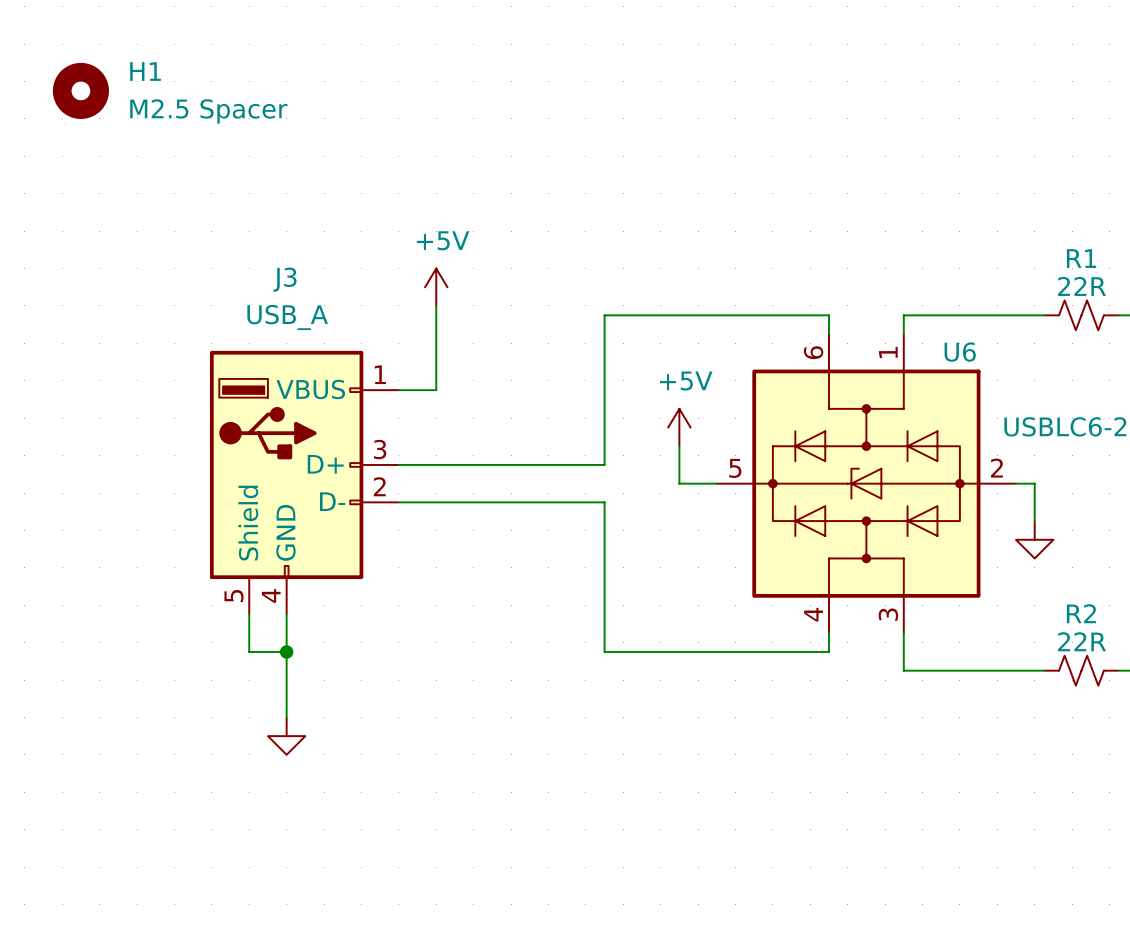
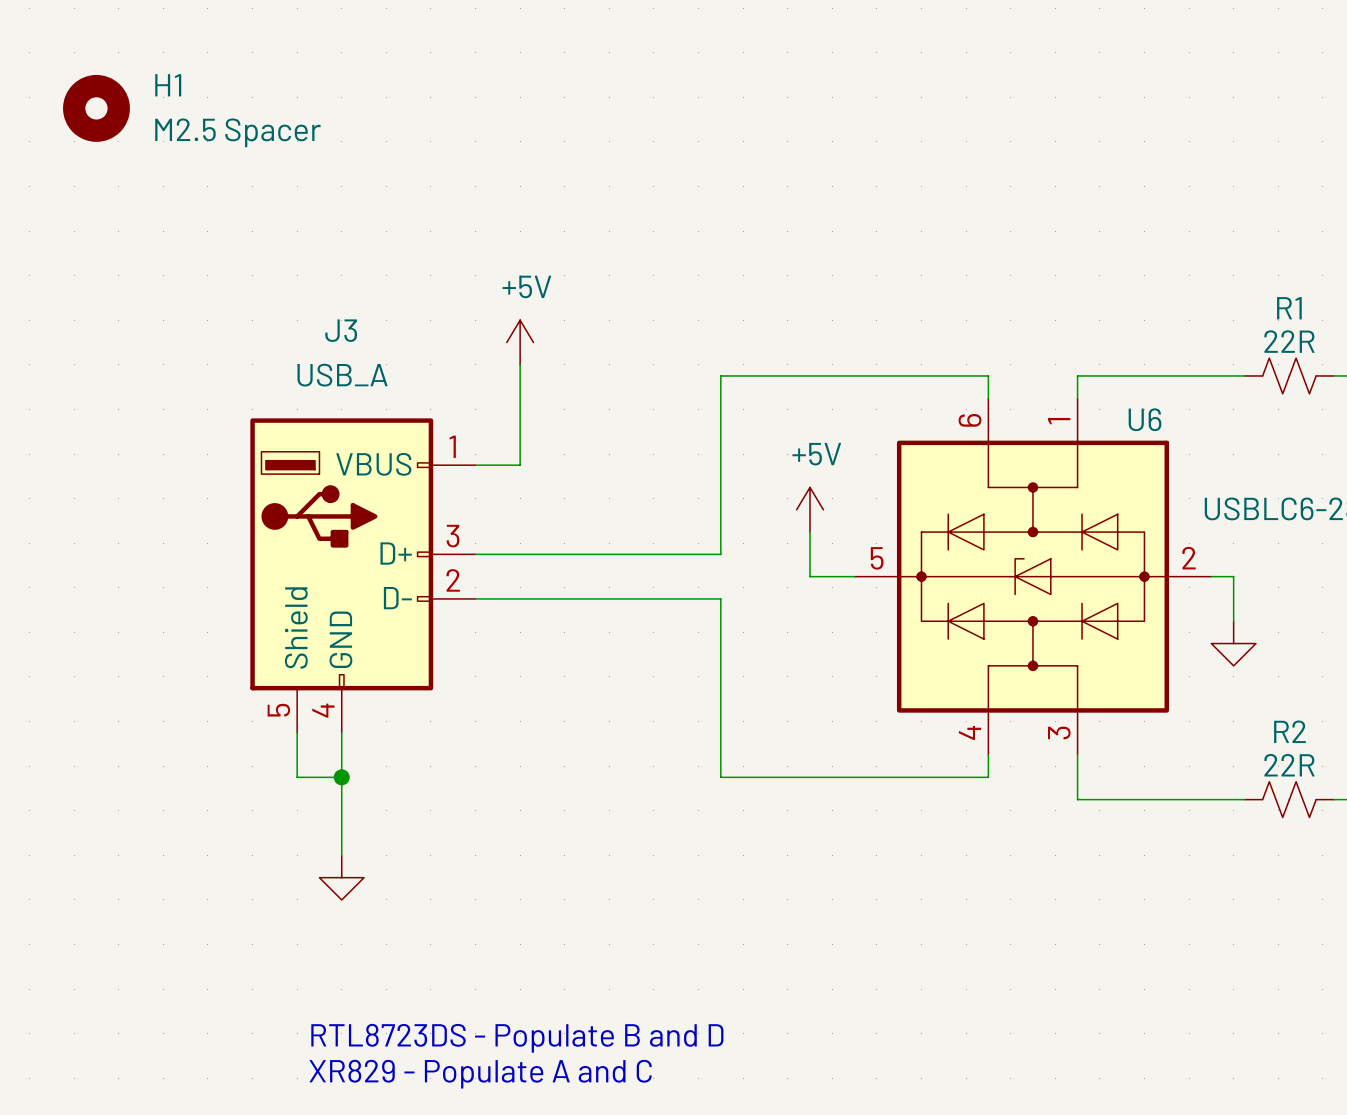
text: none -> RTL8723DS - Populate B and D (517, 1038)
text: none -> XR829 - Populate A and C (480, 1074)

